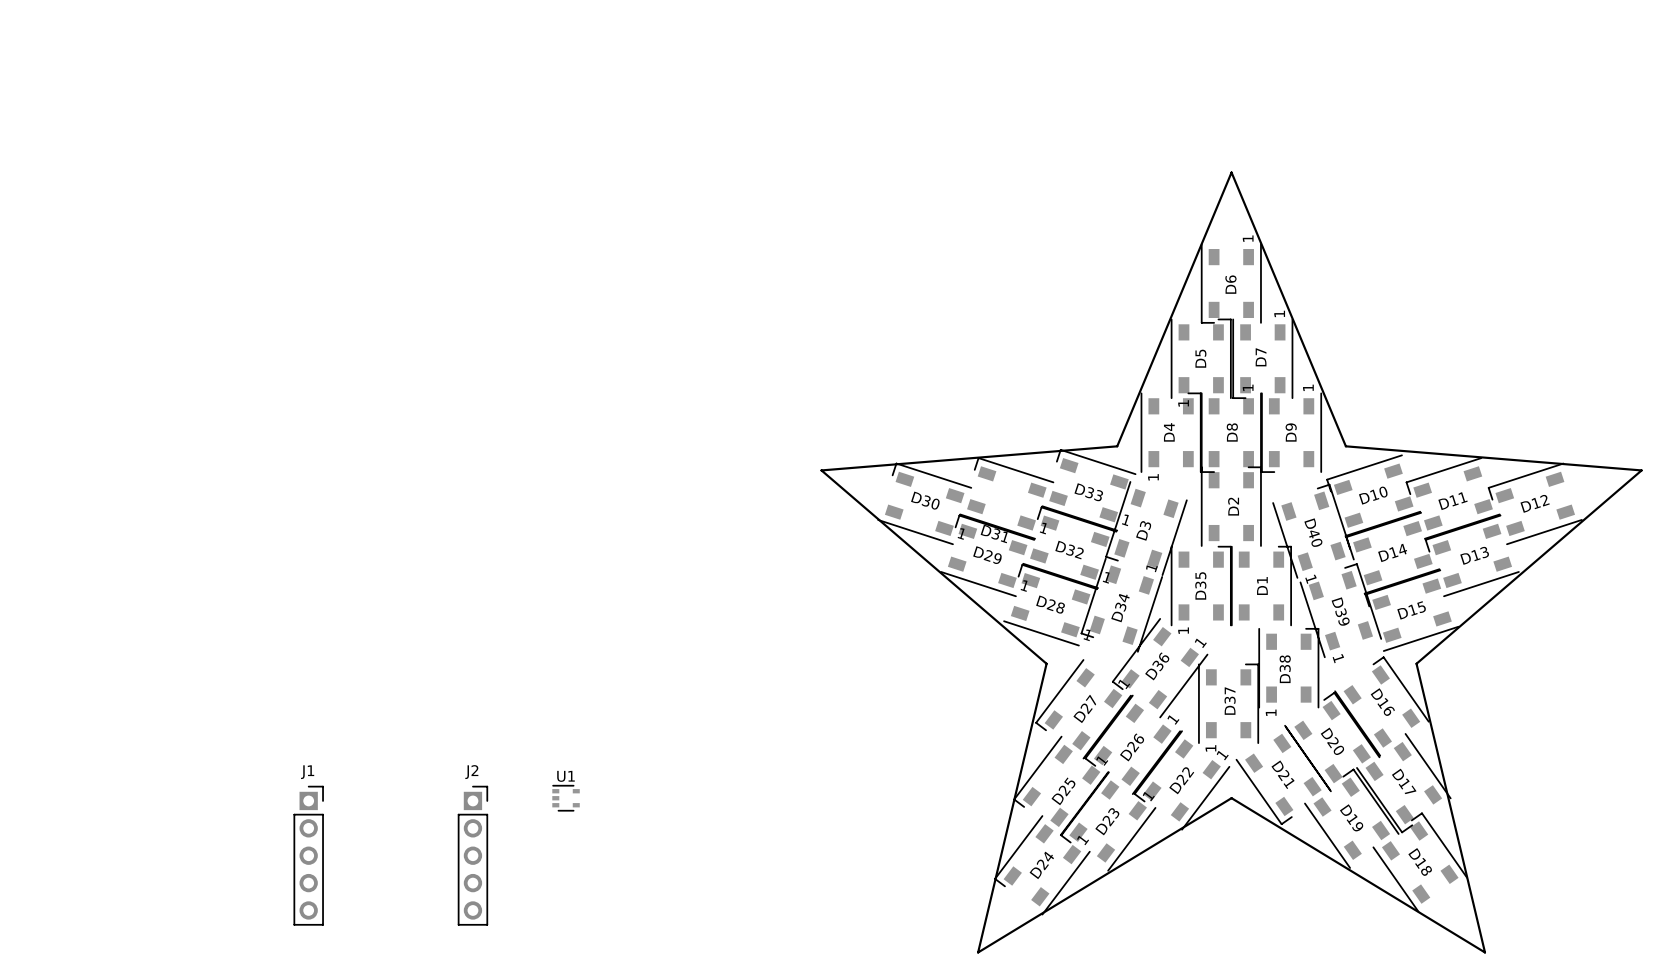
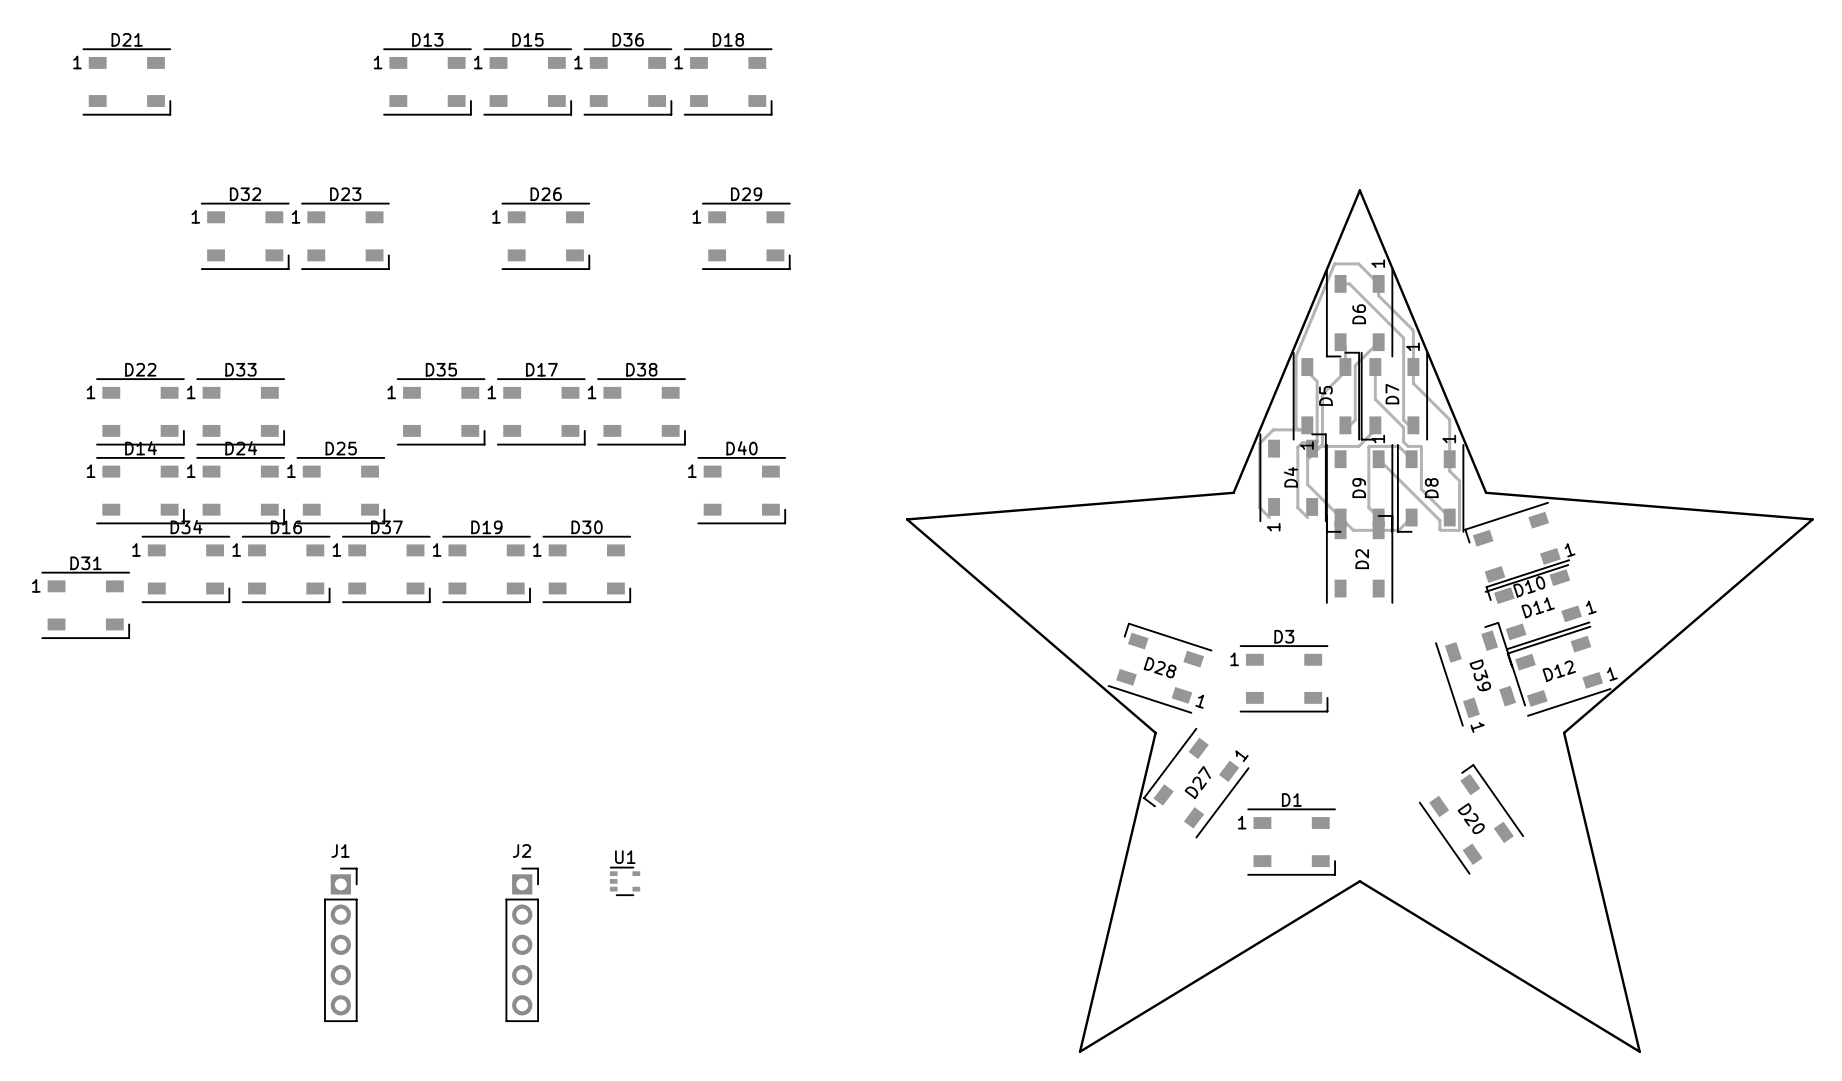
track: none -> (1340, 283) (1349, 283) (1403, 337) (1403, 420) (1413, 429)
track: none -> (1340, 342) (1345, 347) (1345, 371) (1322, 394) (1322, 444) (1307, 459) (1307, 484) (1353, 530) (1398, 530) (1411, 517)
track: none -> (1378, 342) (1355, 365) (1355, 420) (1345, 429)
track: none -> (1307, 371) (1317, 381) (1317, 441) (1302, 442) (1297, 447) (1297, 507) (1307, 517)
track: none -> (1375, 371) (1375, 399) (1403, 427) (1403, 441) (1408, 446) (1421, 447) (1421, 489) (1449, 517)
track: none -> (1298, 429) (1296, 427) (1296, 356) (1334, 263) (1358, 263) (1378, 283) (1378, 295) (1412, 329) (1413, 383) (1449, 419) (1449, 471) (1459, 480) (1459, 529) (1440, 530) (1439, 520) (1378, 459)
track: none -> (1307, 429) (1273, 429) (1259, 443) (1259, 507) (1269, 517)
track: none -> (1375, 429) (1358, 446) (1320, 446)
track: none -> (1411, 459) (1398, 446) (1368, 447) (1368, 507) (1378, 517)
D8 position: (1231, 432) -> (1430, 488)
D9 position: (1291, 432) -> (1359, 488)
D3 footprint: [1105, 481, 1188, 576] -> [1239, 645, 1329, 713]
D33 rotation: 0° (1088, 490) -> 162° clockwise (240, 411)
D33 position: (1088, 490) -> (240, 411)
D33 name position: D33 (1088, 492) -> D33 (240, 369)
D10 name position: D10 (1373, 495) -> D10 (1529, 586)
D31 rotation: 0° (1006, 498) -> 162° clockwise (85, 605)
D31 position: (1006, 498) -> (85, 605)
D10 text: none -> 1 (1570, 550)
D11 position: (1453, 498) -> (1537, 604)
D30 name position: D30 (925, 500) -> D30 (587, 527)
D30 rotation: 0° (924, 503) -> 162° clockwise (586, 569)
D30 position: (924, 503) -> (586, 569)
D12 position: (1535, 503) -> (1559, 671)
D14 footprint: [1345, 512, 1441, 595] -> [96, 457, 185, 525]
D13 footprint: [1425, 514, 1520, 597] -> [383, 48, 472, 116]
D3 name position: D3 (1143, 530) -> D3 (1284, 636)
D40 rotation: 0° (1313, 531) -> 108° clockwise (741, 490)
D40 position: (1313, 531) -> (741, 490)
D40 name position: D40 (1313, 532) -> D40 (742, 448)
D1 footprint: [1231, 546, 1292, 627] -> [1247, 808, 1336, 876]
D32 rotation: 0° (1069, 547) -> 162° clockwise (245, 236)
D32 position: (1069, 547) -> (245, 236)
D32 name position: D32 (1069, 550) -> D32 (245, 194)
D11 text: none -> 1 (1591, 607)
D14 name position: D14 (1392, 552) -> D14 (141, 448)
D29 rotation: 0° (987, 555) -> 162° clockwise (746, 236)
D29 position: (987, 555) -> (746, 236)
D29 name position: D29 (987, 555) -> D29 (746, 194)
D13 name position: D13 (1474, 555) -> D13 (427, 39)
D15 footprint: [1364, 569, 1460, 652] -> [483, 48, 572, 116]
D35 name position: D35 (1200, 585) -> D35 (441, 369)
D1 name position: D1 (1262, 585) -> D1 (1291, 799)
D35 rotation: 0° (1201, 586) -> 90° clockwise (441, 411)
D35 position: (1201, 586) -> (441, 411)
D34 rotation: 0° (1121, 605) -> 108° counterclockwise (185, 569)
D34 position: (1121, 605) -> (185, 569)
D34 name position: D34 (1120, 608) -> D34 (186, 527)
D15 name position: D15 (1411, 610) -> D15 (528, 39)
D12 text: none -> 1 (1612, 674)
D16 footprint: [1334, 656, 1430, 757] -> [241, 536, 331, 603]
D36 name position: D36 (1157, 666) -> D36 (628, 39)
D36 rotation: 0° (1160, 668) -> 127° counterclockwise (627, 81)
D36 position: (1160, 668) -> (627, 81)
D38 rotation: 0° (1288, 668) -> 90° clockwise (641, 411)
D38 position: (1288, 668) -> (641, 411)
D38 name position: D38 (1285, 669) -> D38 (641, 369)
D37 name position: D37 (1230, 701) -> D37 (386, 527)
D16 name position: D16 (1382, 702) -> D16 (286, 527)
D37 rotation: 0° (1228, 703) -> 90° clockwise (386, 569)
D37 position: (1228, 703) -> (386, 569)
D21 footprint: [1235, 725, 1331, 825] -> [82, 48, 172, 116]
D17 footprint: [1356, 733, 1452, 834] -> [497, 378, 586, 446]
D26 rotation: 0° (1132, 744) -> 127° counterclockwise (545, 236)
D26 position: (1132, 744) -> (545, 236)
D26 name position: D26 (1132, 747) -> D26 (546, 194)
D19 footprint: [1304, 768, 1400, 869] -> [442, 536, 531, 603]
D21 name position: D21 (1283, 774) -> D21 (127, 39)
D22 name position: D22 (1181, 780) -> D22 (140, 369)
D22 rotation: 0° (1182, 780) -> 127° counterclockwise (140, 411)
D22 position: (1182, 780) -> (140, 411)
D17 name position: D17 (1404, 781) -> D17 (541, 369)
D25 rotation: 0° (1061, 785) -> 127° counterclockwise (340, 490)
D25 position: (1061, 785) -> (340, 490)
D25 name position: D25 (1063, 791) -> D25 (341, 448)
D18 footprint: [1372, 812, 1468, 913] -> [683, 48, 773, 116]
D19 name position: D19 (1351, 817) -> D19 (486, 527)
D23 name position: D23 (1107, 821) -> D23 (345, 194)
D23 rotation: 0° (1108, 821) -> 127° counterclockwise (345, 236)
D23 position: (1108, 821) -> (345, 236)
D18 name position: D18 (1420, 862) -> D18 (728, 39)
D24 name position: D24 (1041, 865) -> D24 (241, 448)
D24 rotation: 0° (1042, 865) -> 127° counterclockwise (240, 490)
D24 position: (1042, 865) -> (240, 490)

